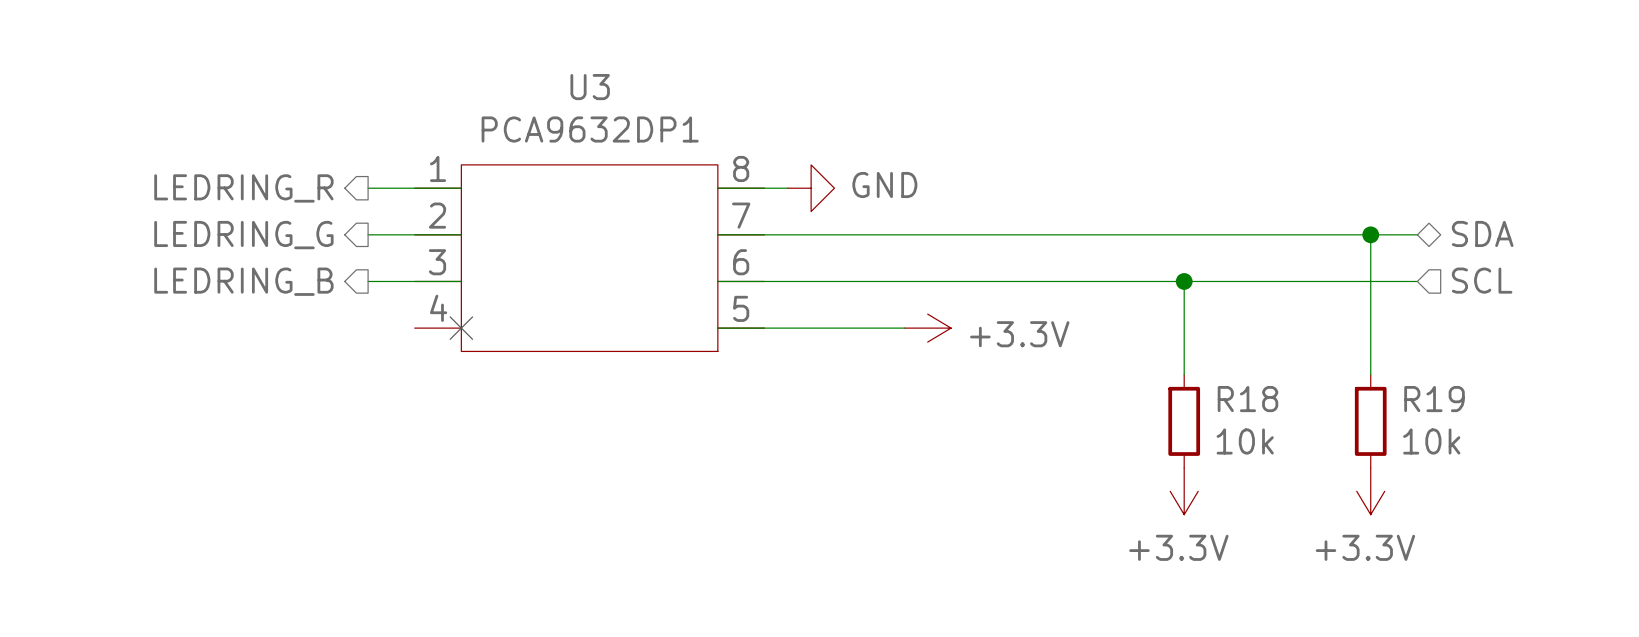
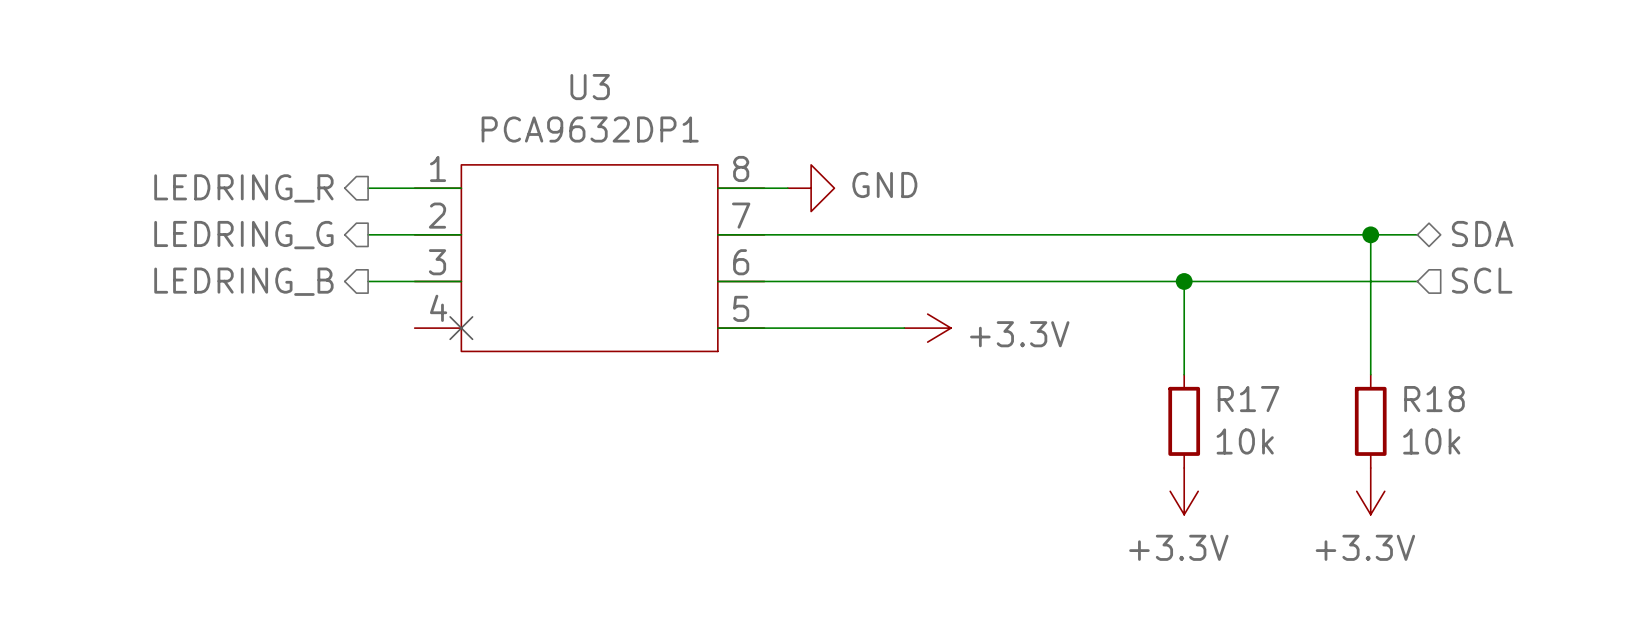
R18 name: R18 (1247, 399) -> R17 (1248, 399)
R19 name: R19 (1434, 399) -> R18 (1434, 399)

